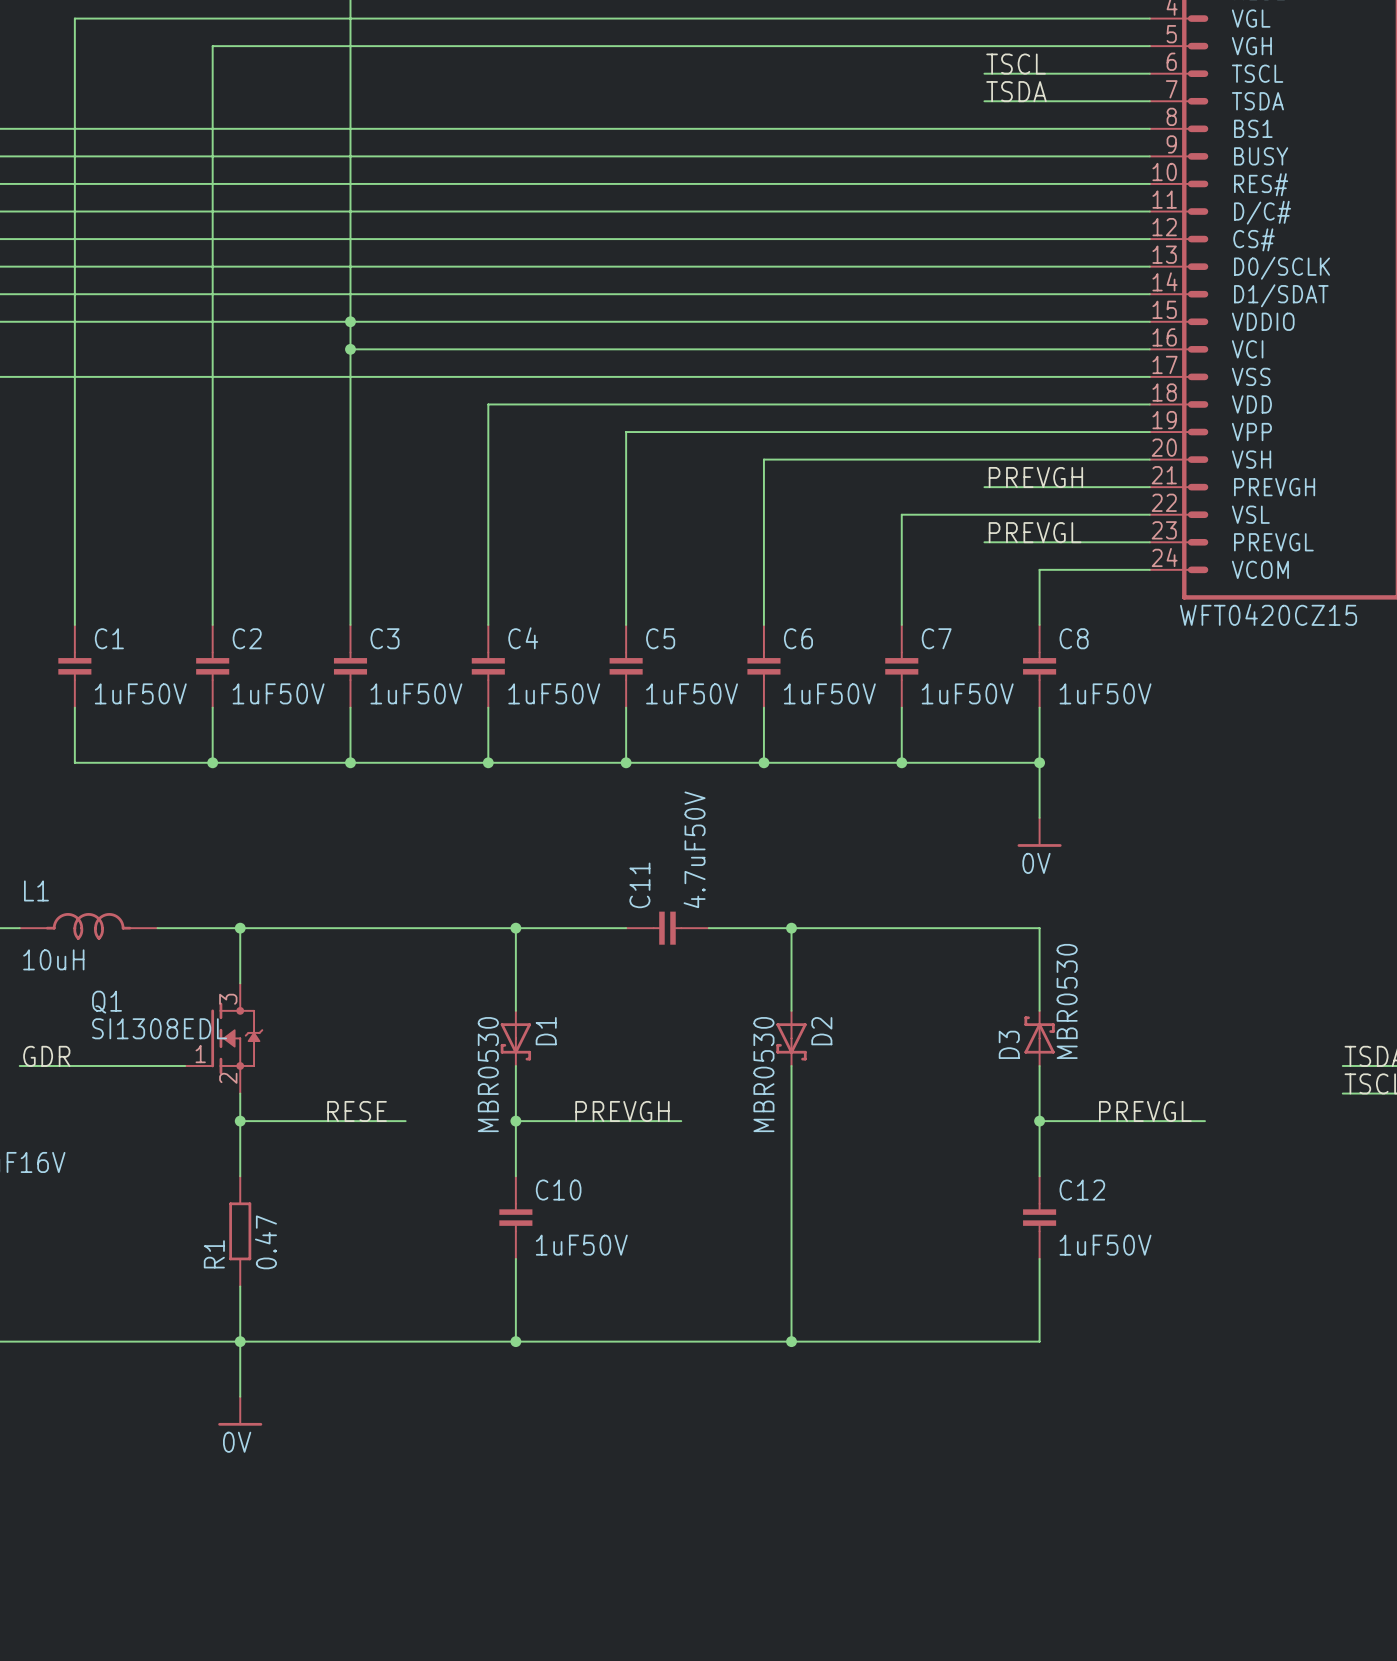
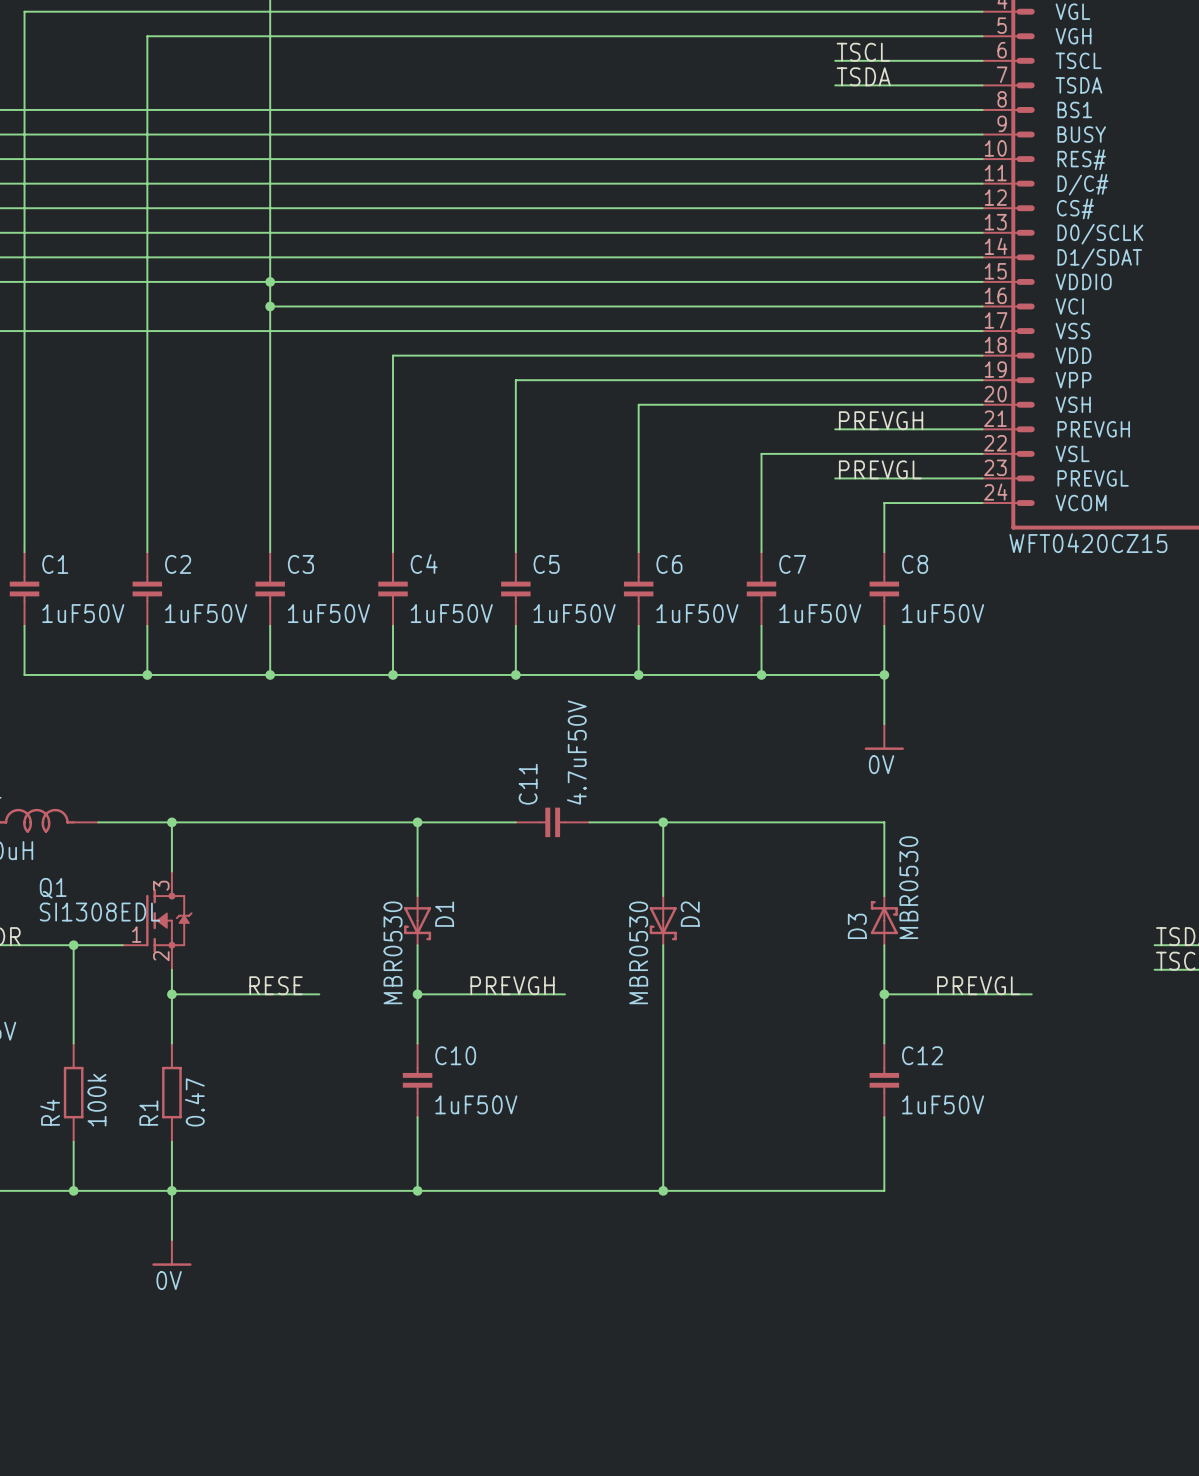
wire: none -> (73, 945) (73, 1043)
junction: none -> (73, 945)
R4: none -> 100k (73, 1092)
wire: none -> (73, 1141) (73, 1190)
junction: none -> (73, 1190)

